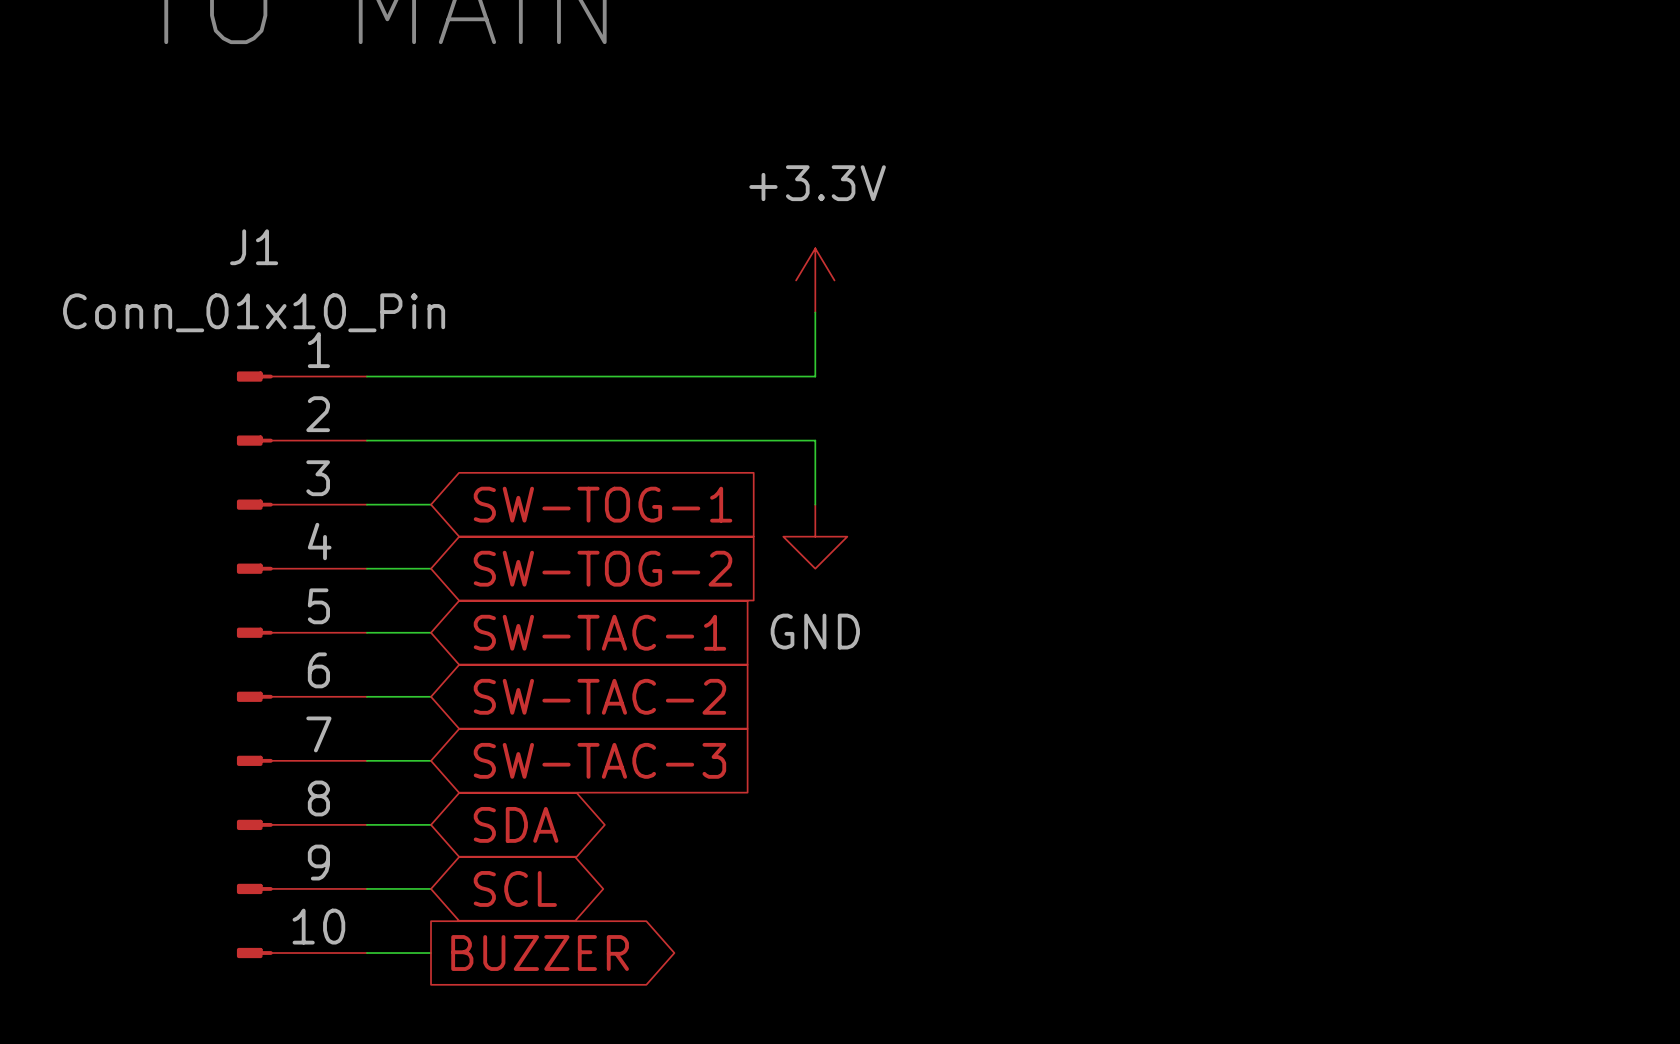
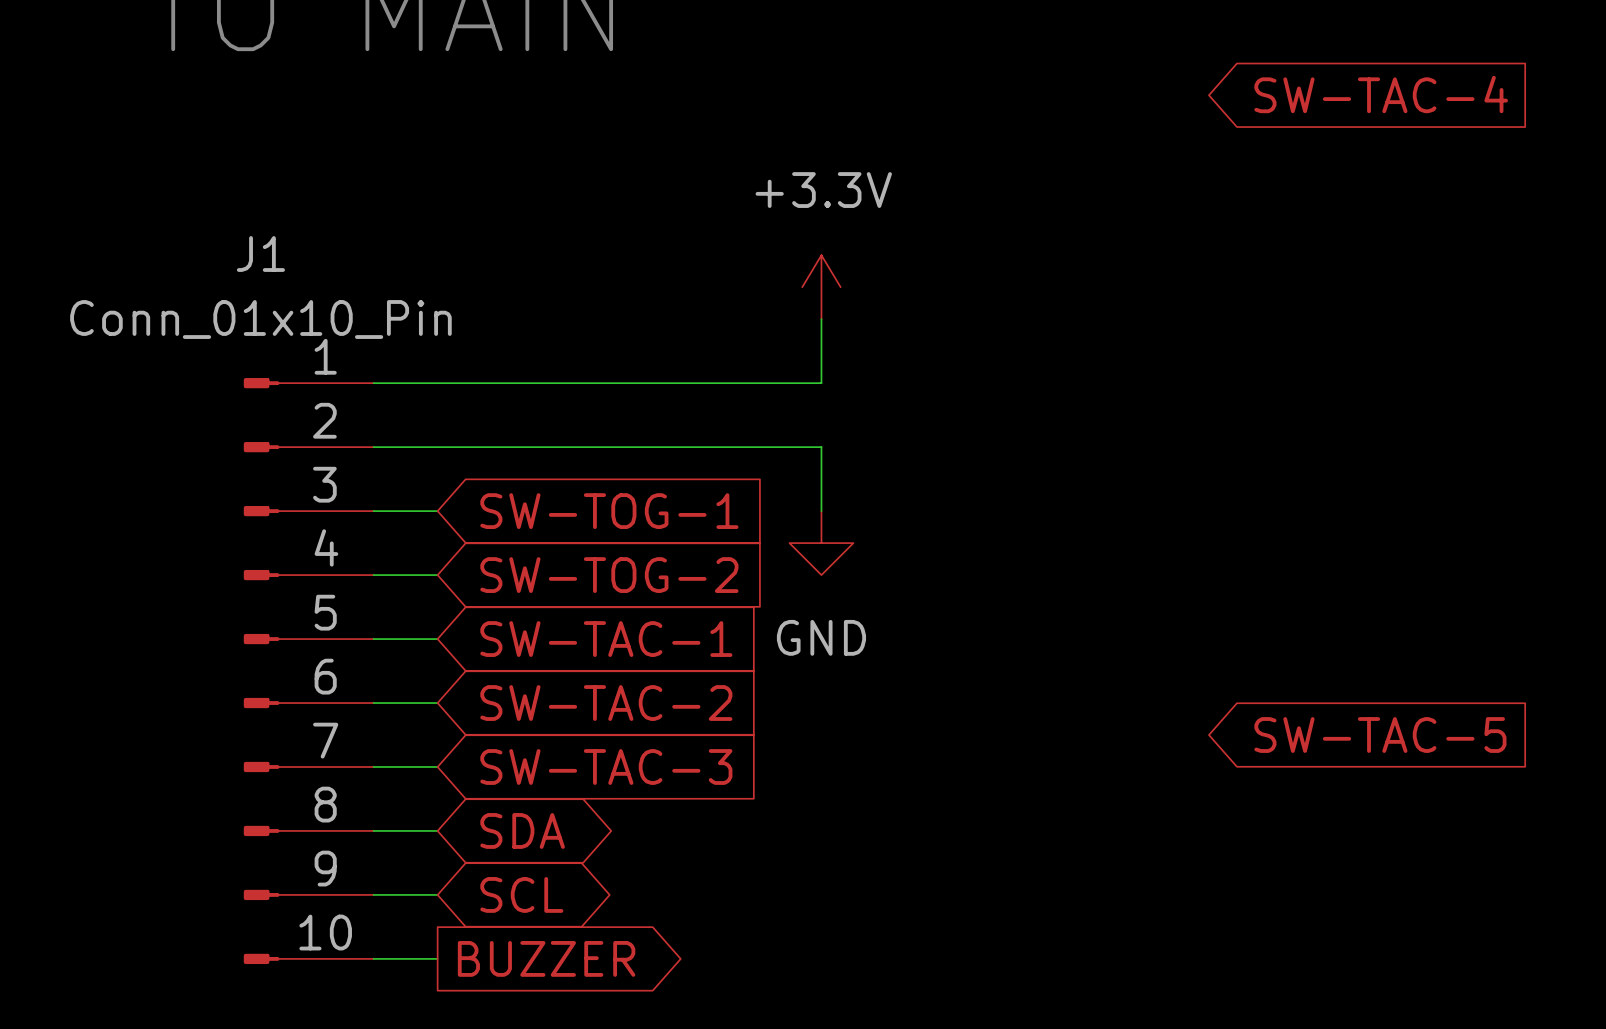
global label: none -> SW-TAC-4 (1381, 94)
global label: none -> SW-TAC-5 (1380, 735)

